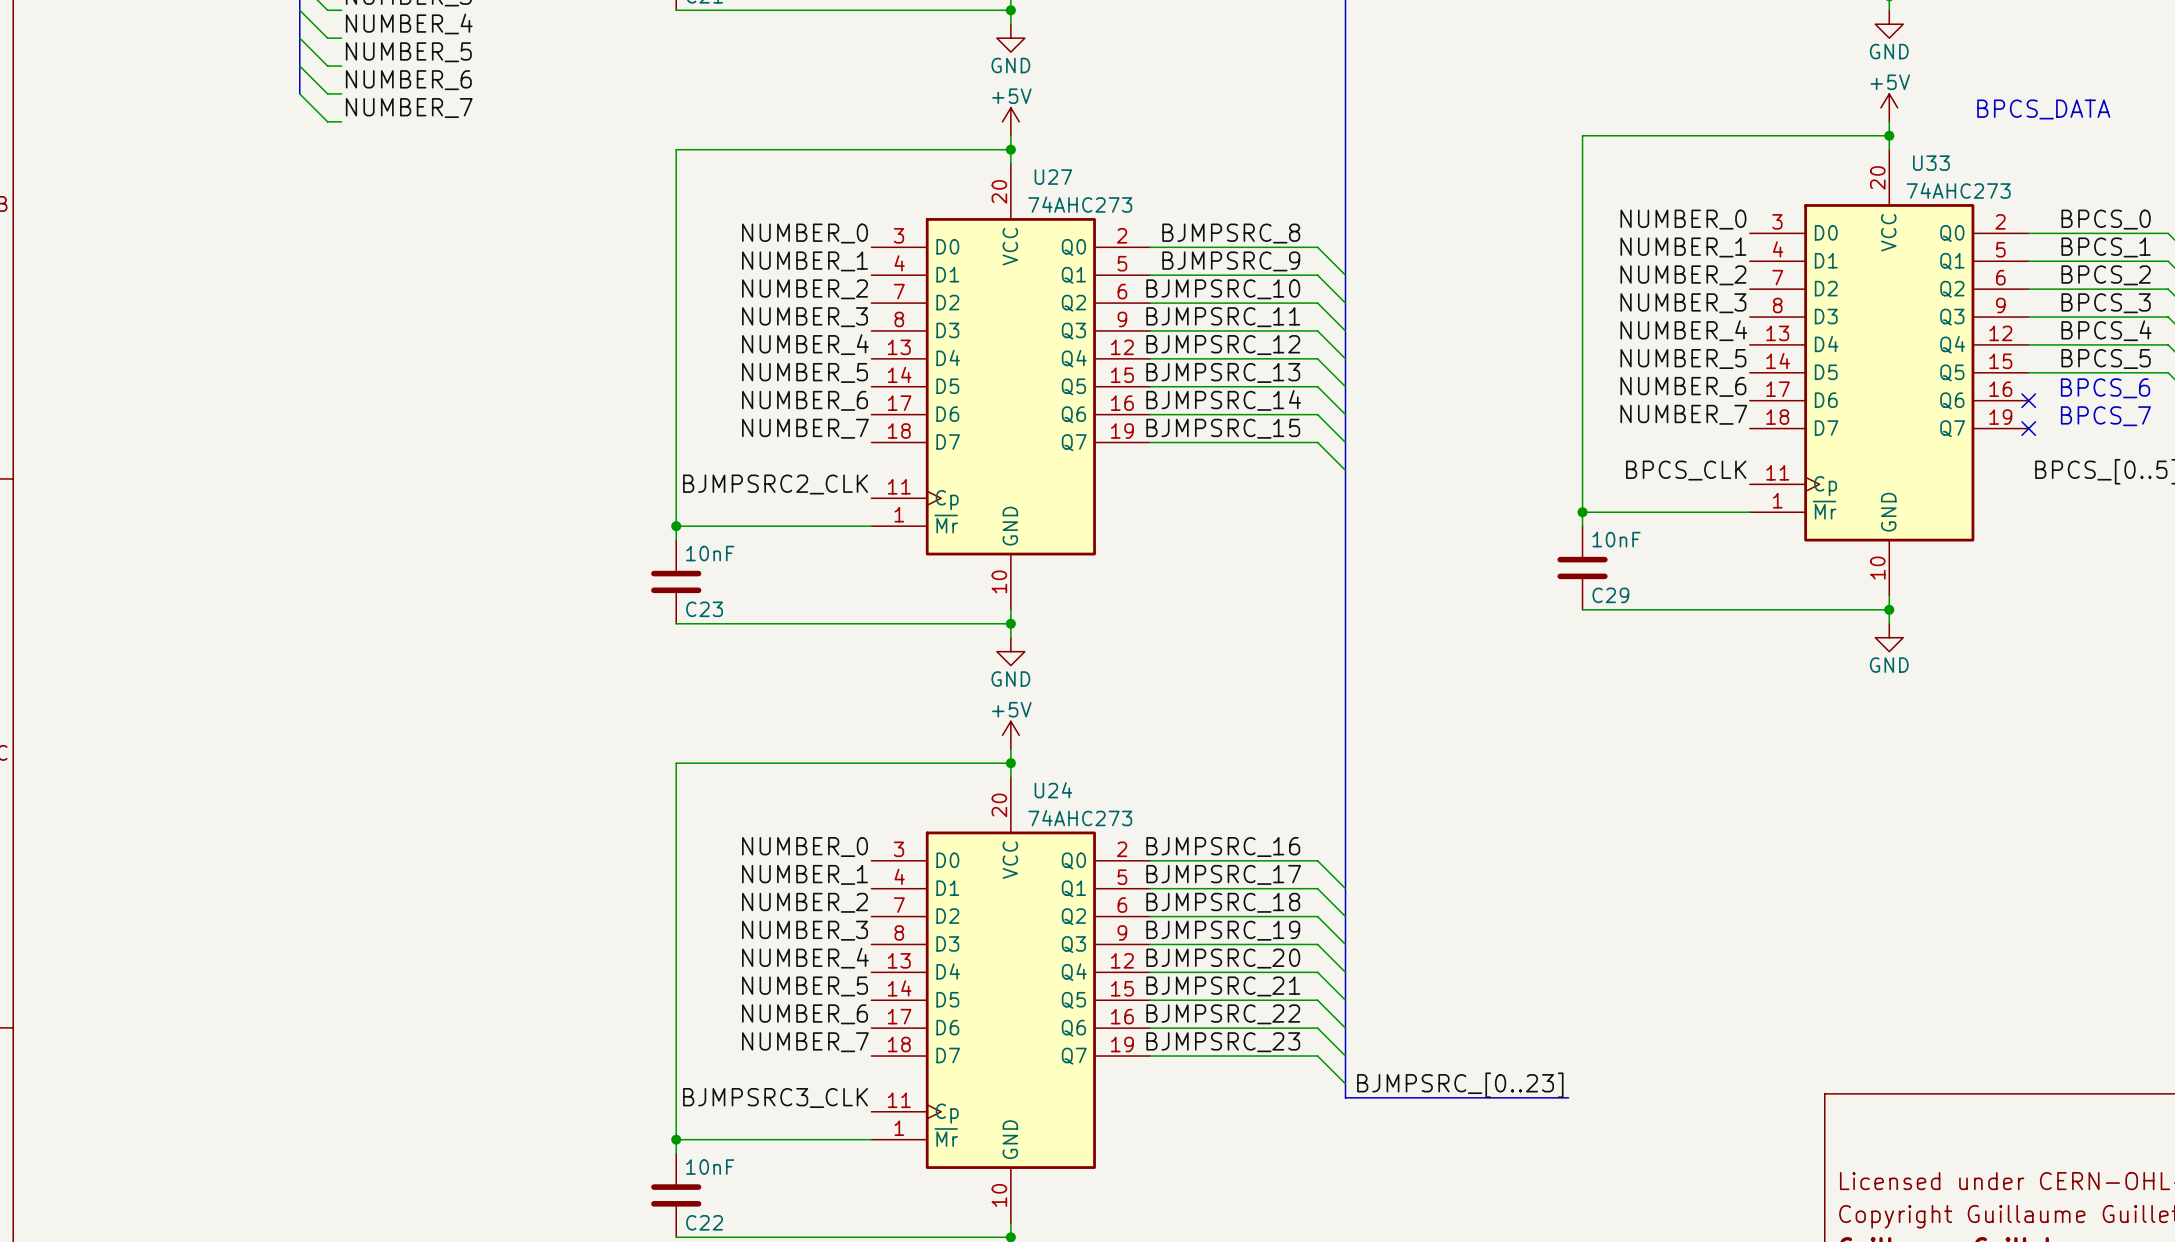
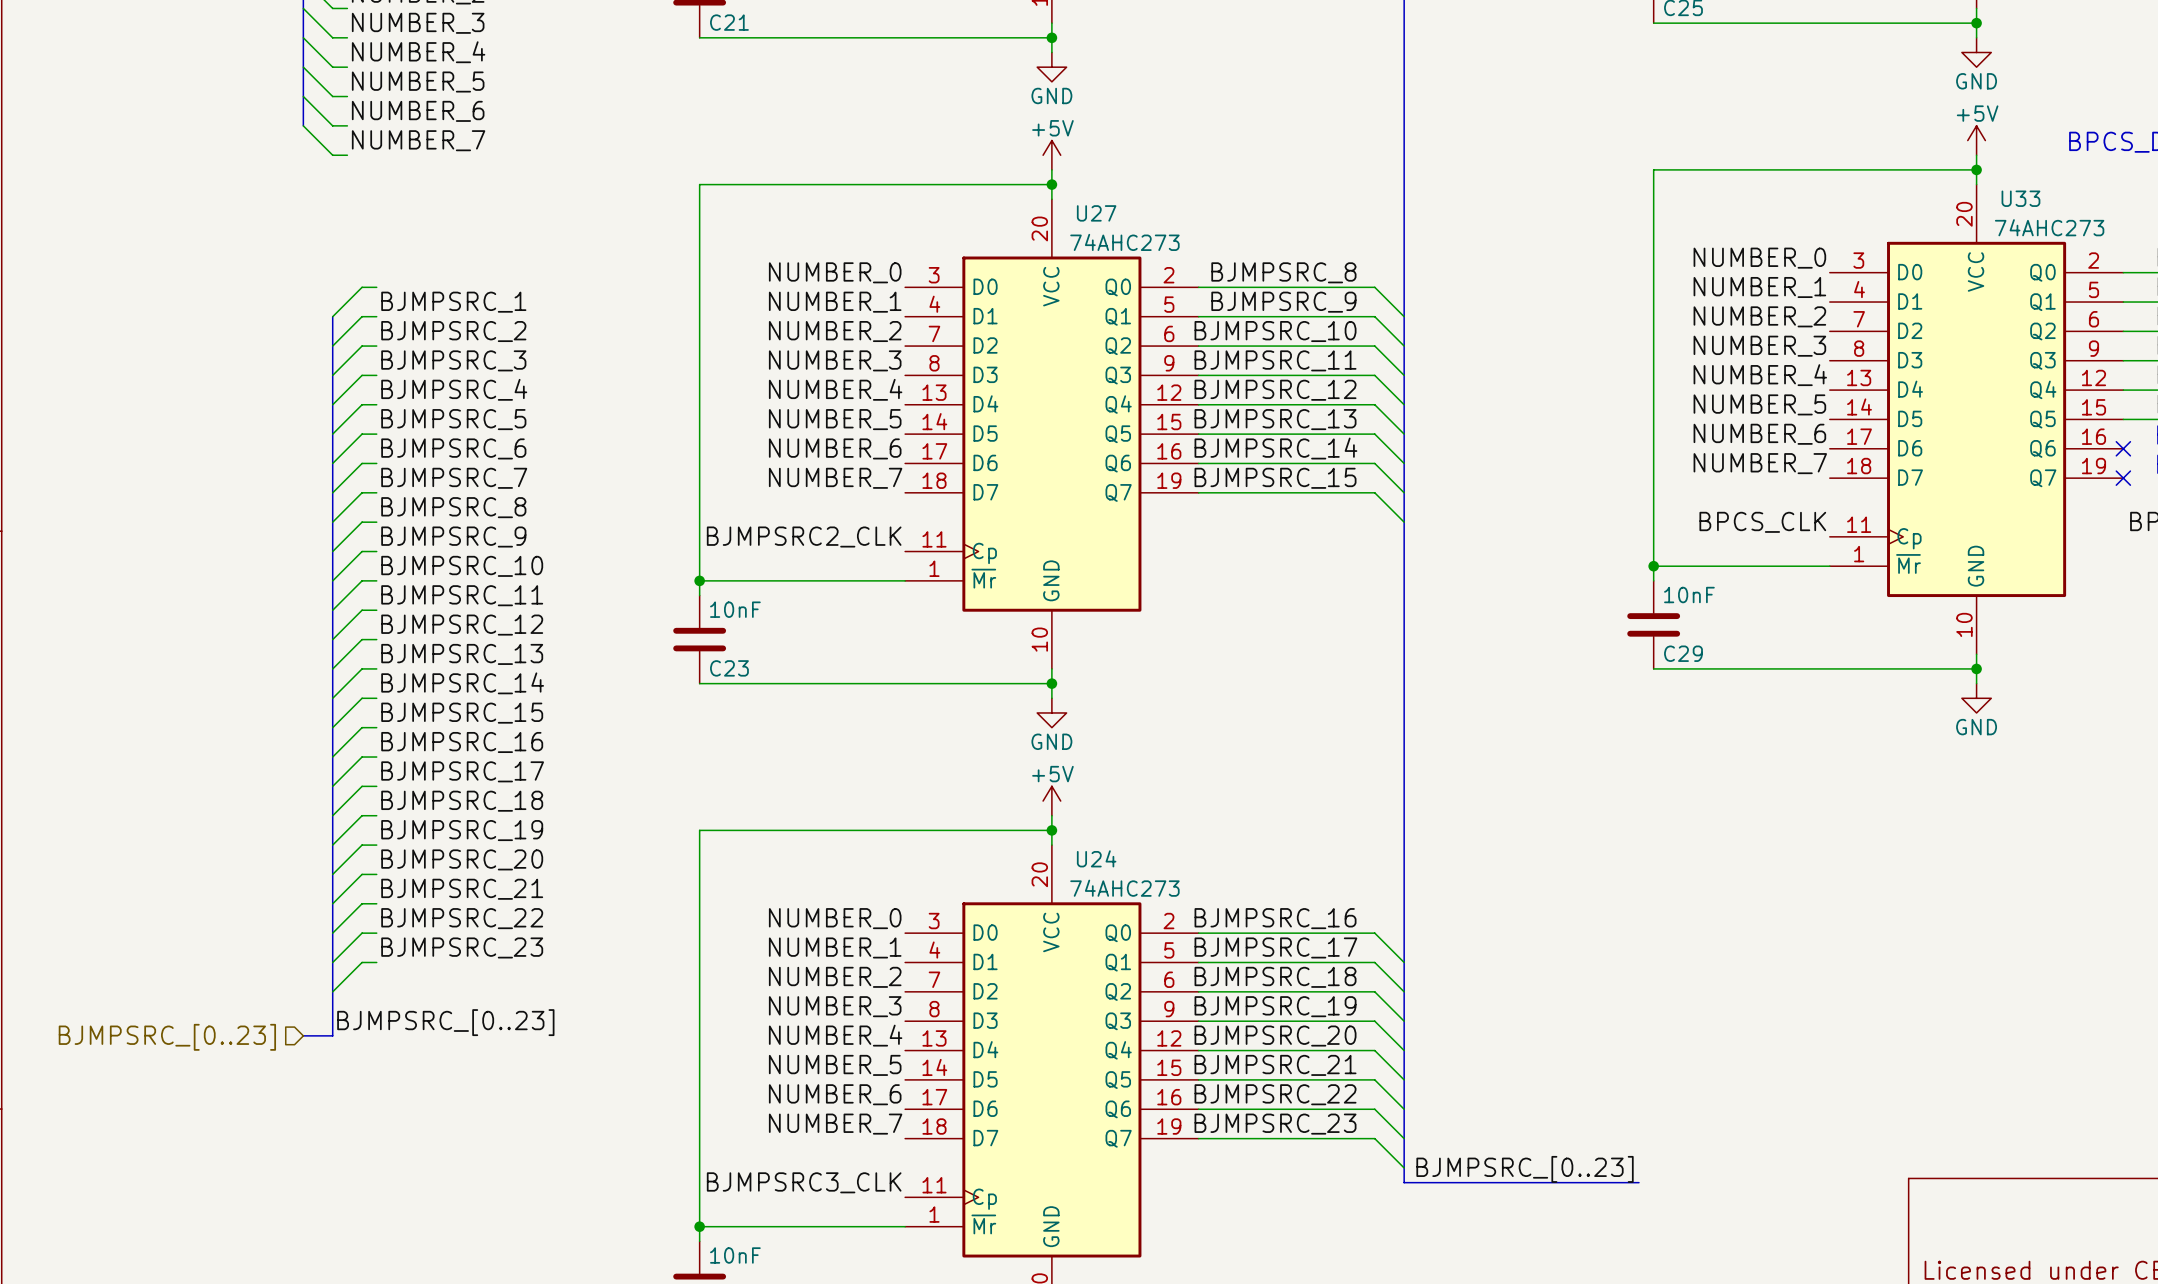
wire: none -> (376, 287) (362, 287) (332, 316)
label: none -> BJMPSRC_1 (453, 302)
bus: none -> (332, 316) (332, 1035) (303, 1035)
wire: none -> (376, 316) (362, 316) (332, 346)
label: none -> BJMPSRC_2 (453, 331)
wire: none -> (376, 346) (362, 346) (332, 375)
label: none -> BJMPSRC_3 (453, 360)
wire: none -> (376, 375) (362, 375) (332, 404)
label: none -> BJMPSRC_4 (454, 389)
wire: none -> (376, 404) (362, 404) (332, 434)
label: none -> BJMPSRC_5 (453, 419)
wire: none -> (376, 434) (362, 434) (332, 463)
label: none -> BJMPSRC_6 (453, 448)
wire: none -> (376, 463) (362, 463) (332, 492)
label: none -> BJMPSRC_7 (454, 478)
wire: none -> (376, 492) (362, 492) (332, 522)
label: none -> BJMPSRC_8 (453, 507)
wire: none -> (376, 522) (362, 522) (332, 551)
label: none -> BJMPSRC_9 (453, 537)
wire: none -> (376, 551) (362, 551) (332, 580)
label: none -> BJMPSRC_10 (462, 566)
wire: none -> (376, 580) (362, 580) (332, 610)
label: none -> BJMPSRC_11 (462, 595)
wire: none -> (376, 610) (362, 610) (332, 639)
label: none -> BJMPSRC_12 (462, 625)
wire: none -> (376, 639) (362, 639) (332, 668)
label: none -> BJMPSRC_13 (462, 654)
wire: none -> (376, 668) (362, 668) (332, 698)
label: none -> BJMPSRC_14 (462, 683)
wire: none -> (376, 698) (362, 698) (332, 727)
label: none -> BJMPSRC_15 (462, 713)
wire: none -> (376, 727) (362, 727) (332, 757)
label: none -> BJMPSRC_16 (462, 742)
wire: none -> (376, 757) (362, 757) (332, 786)
label: none -> BJMPSRC_17 (462, 771)
wire: none -> (376, 786) (362, 786) (332, 815)
label: none -> BJMPSRC_18 (462, 801)
wire: none -> (376, 815) (362, 815) (332, 845)
label: none -> BJMPSRC_19 (462, 830)
wire: none -> (376, 845) (362, 845) (332, 874)
label: none -> BJMPSRC_20 (462, 859)
wire: none -> (376, 874) (362, 874) (332, 903)
label: none -> BJMPSRC_21 (462, 889)
wire: none -> (376, 903) (362, 903) (332, 933)
label: none -> BJMPSRC_22 (462, 918)
wire: none -> (376, 933) (362, 933) (332, 962)
label: none -> BJMPSRC_23 (462, 947)
wire: none -> (376, 962) (362, 962) (332, 991)
label: none -> BJMPSRC_[0..23] (445, 1022)
hierarchical label: none -> BJMPSRC_[0..23] (167, 1037)

